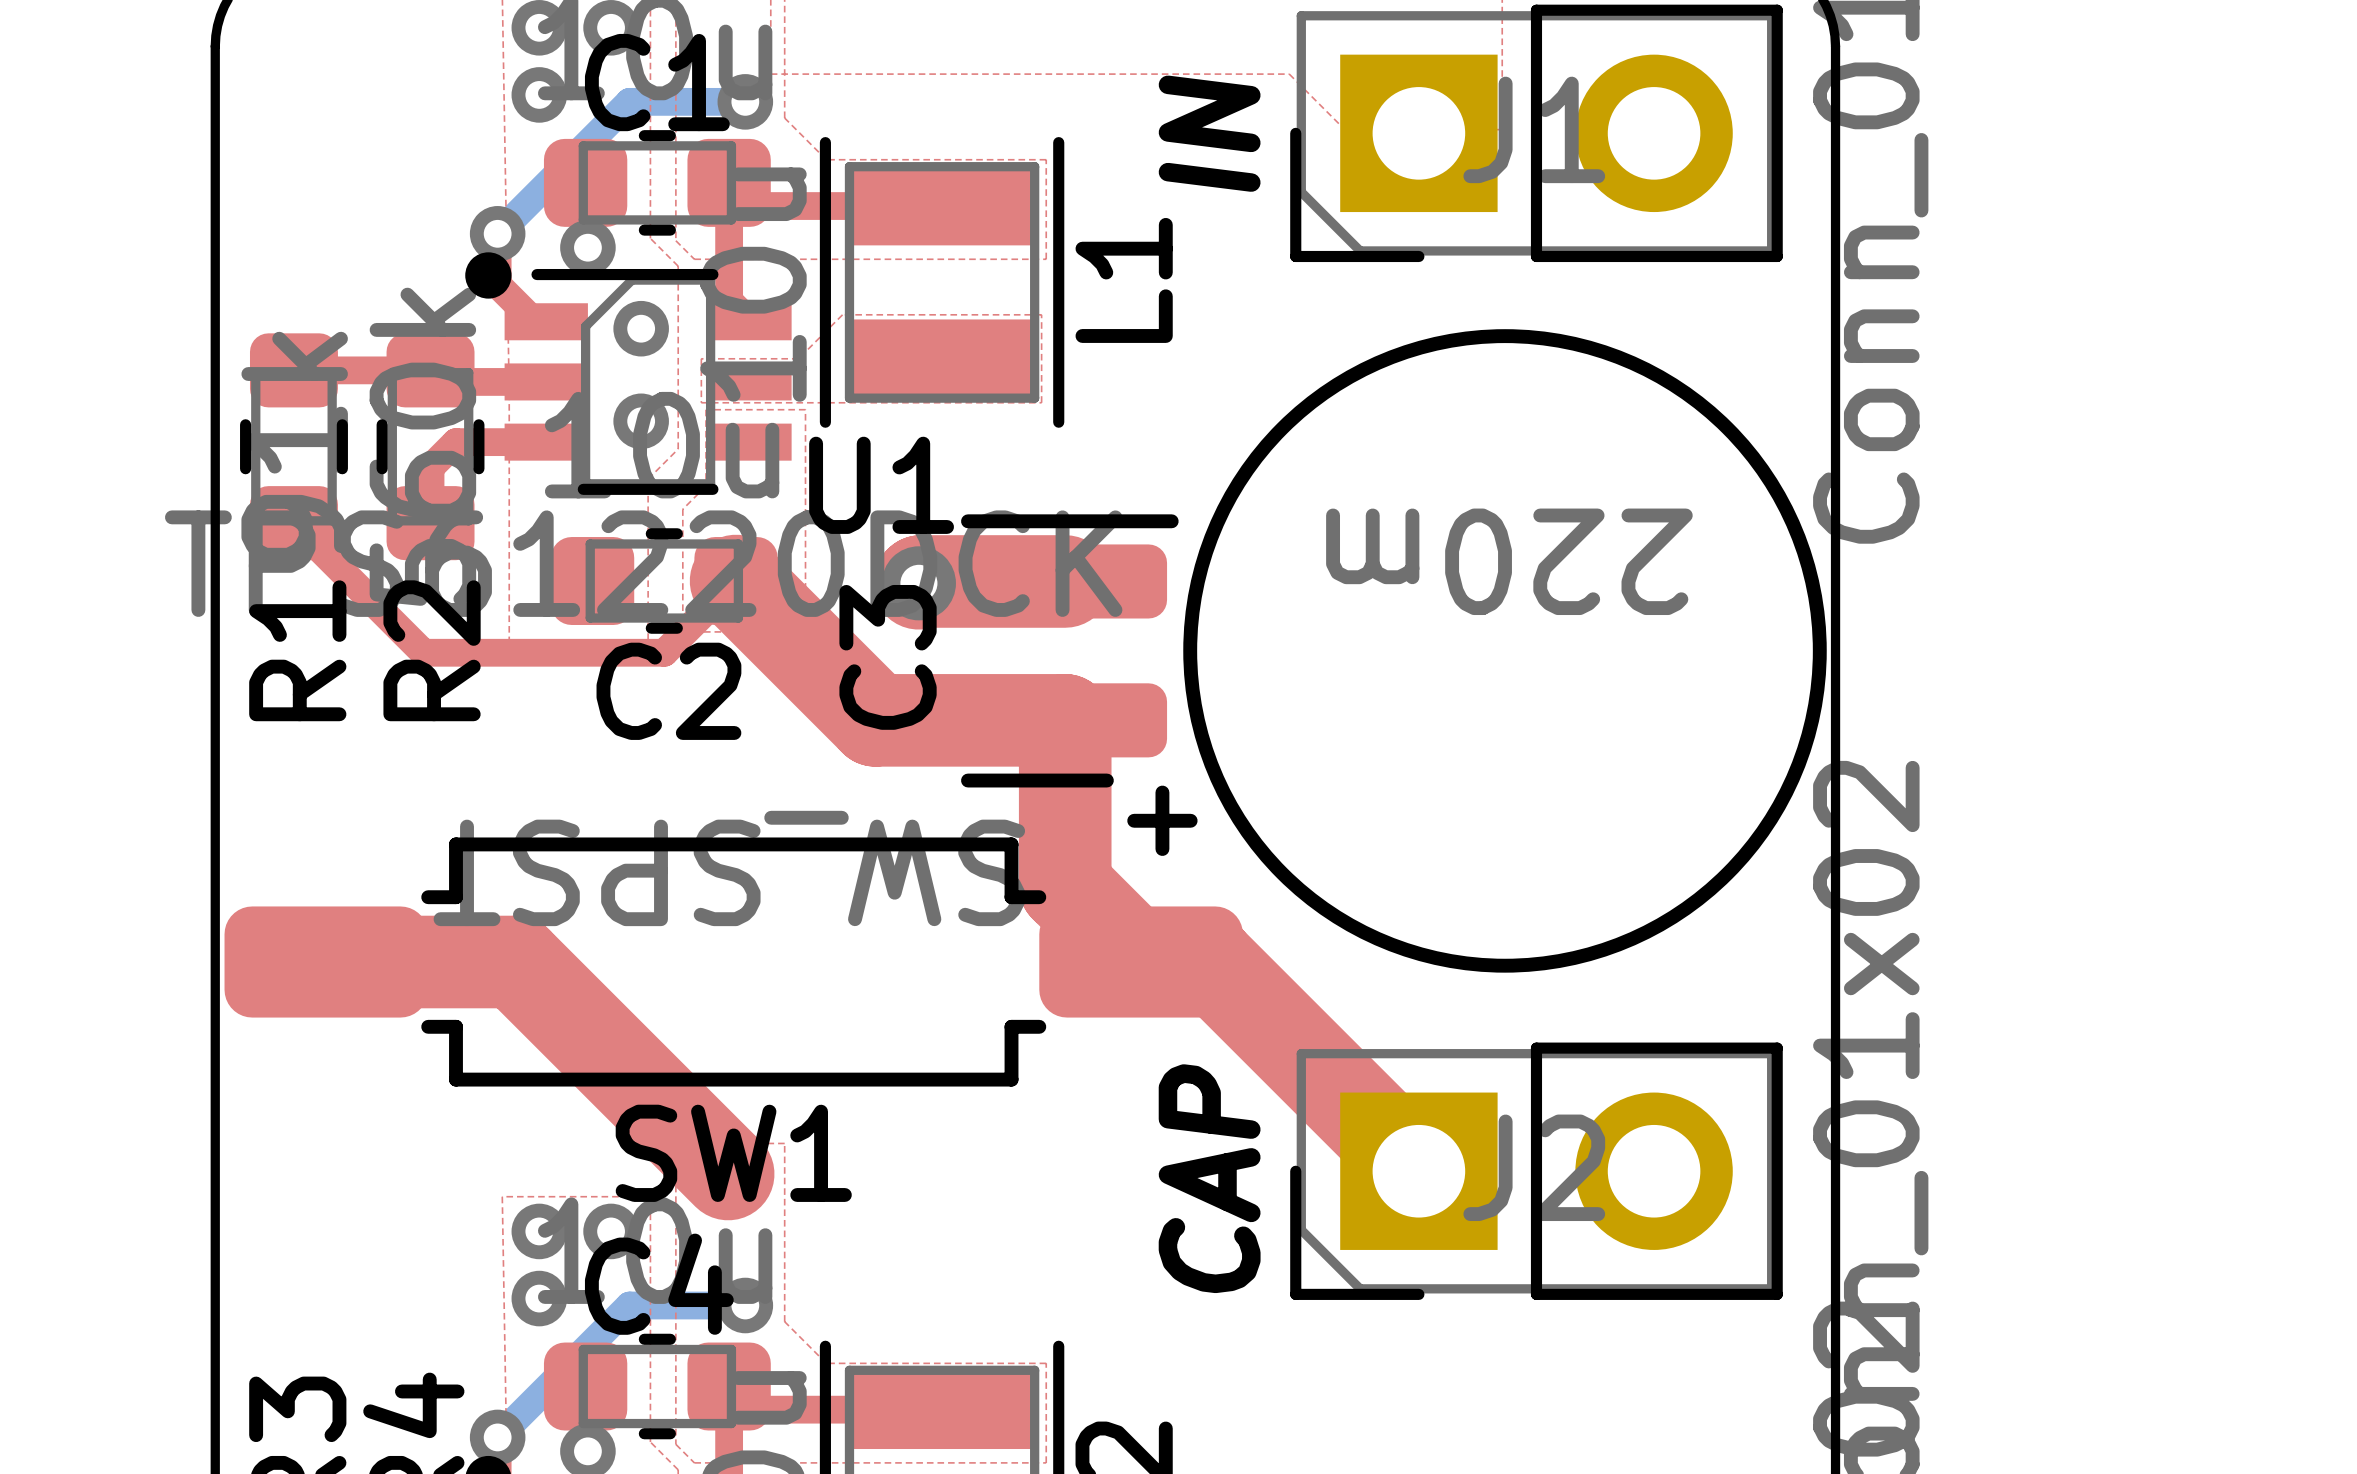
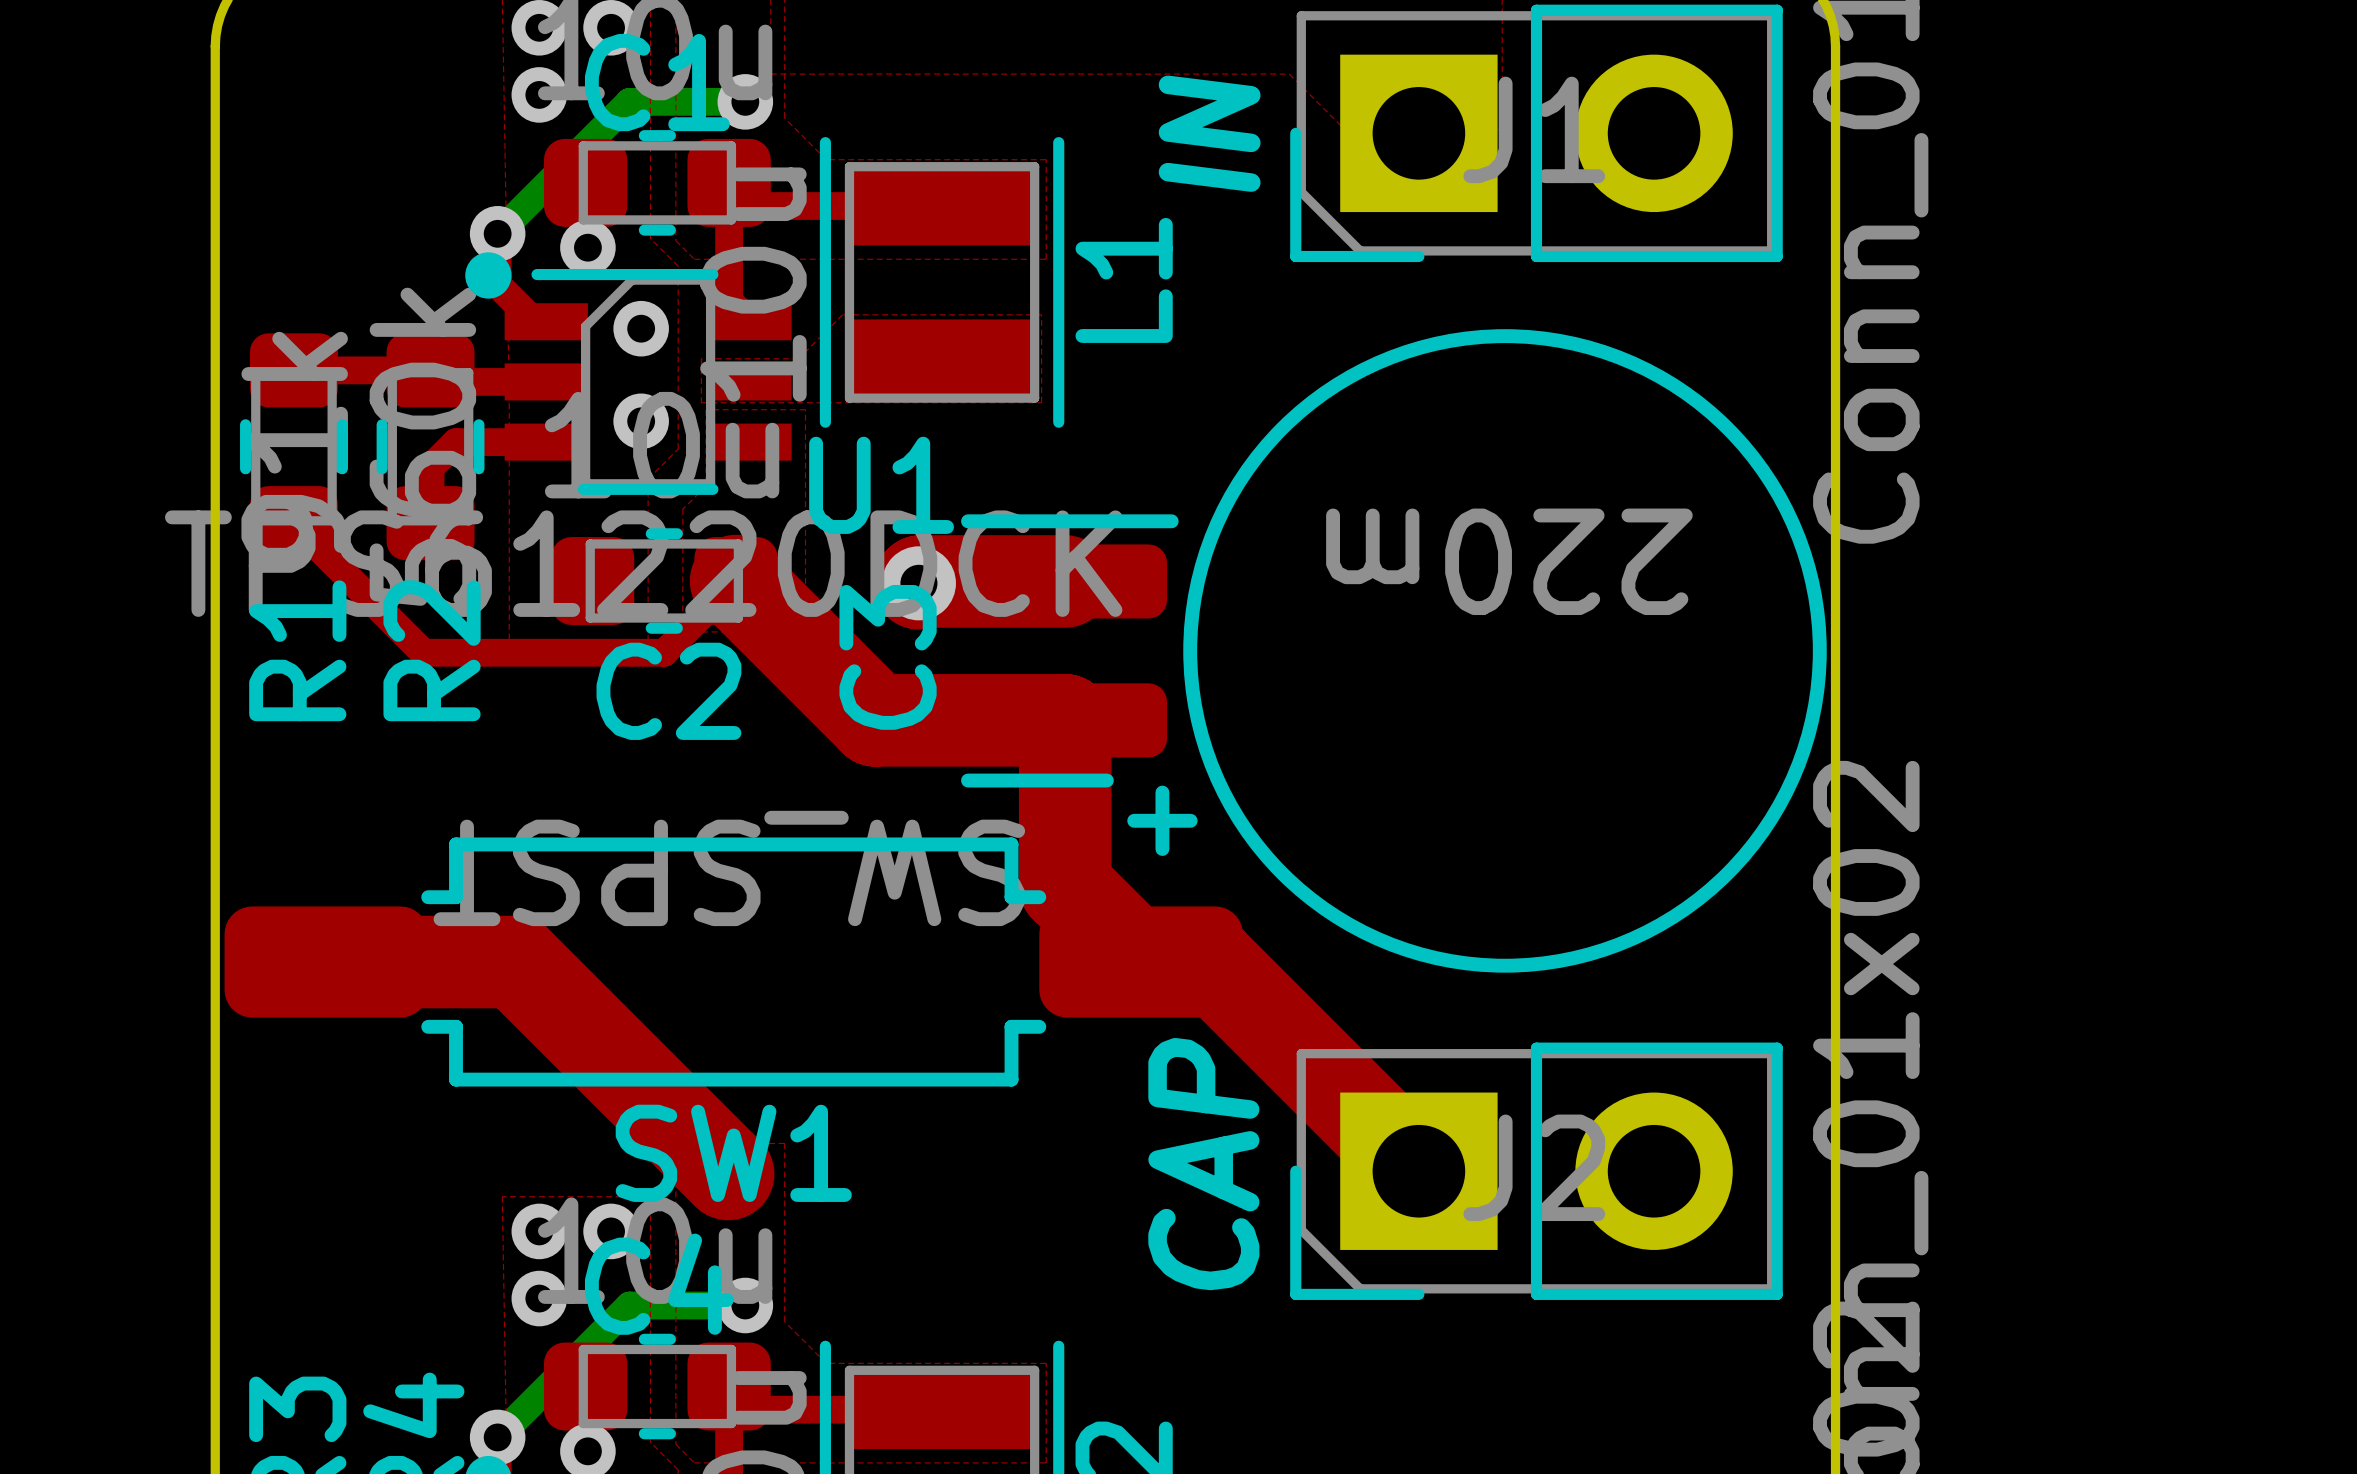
text position: CAP (1209, 1178) -> CAP (1203, 1164)

